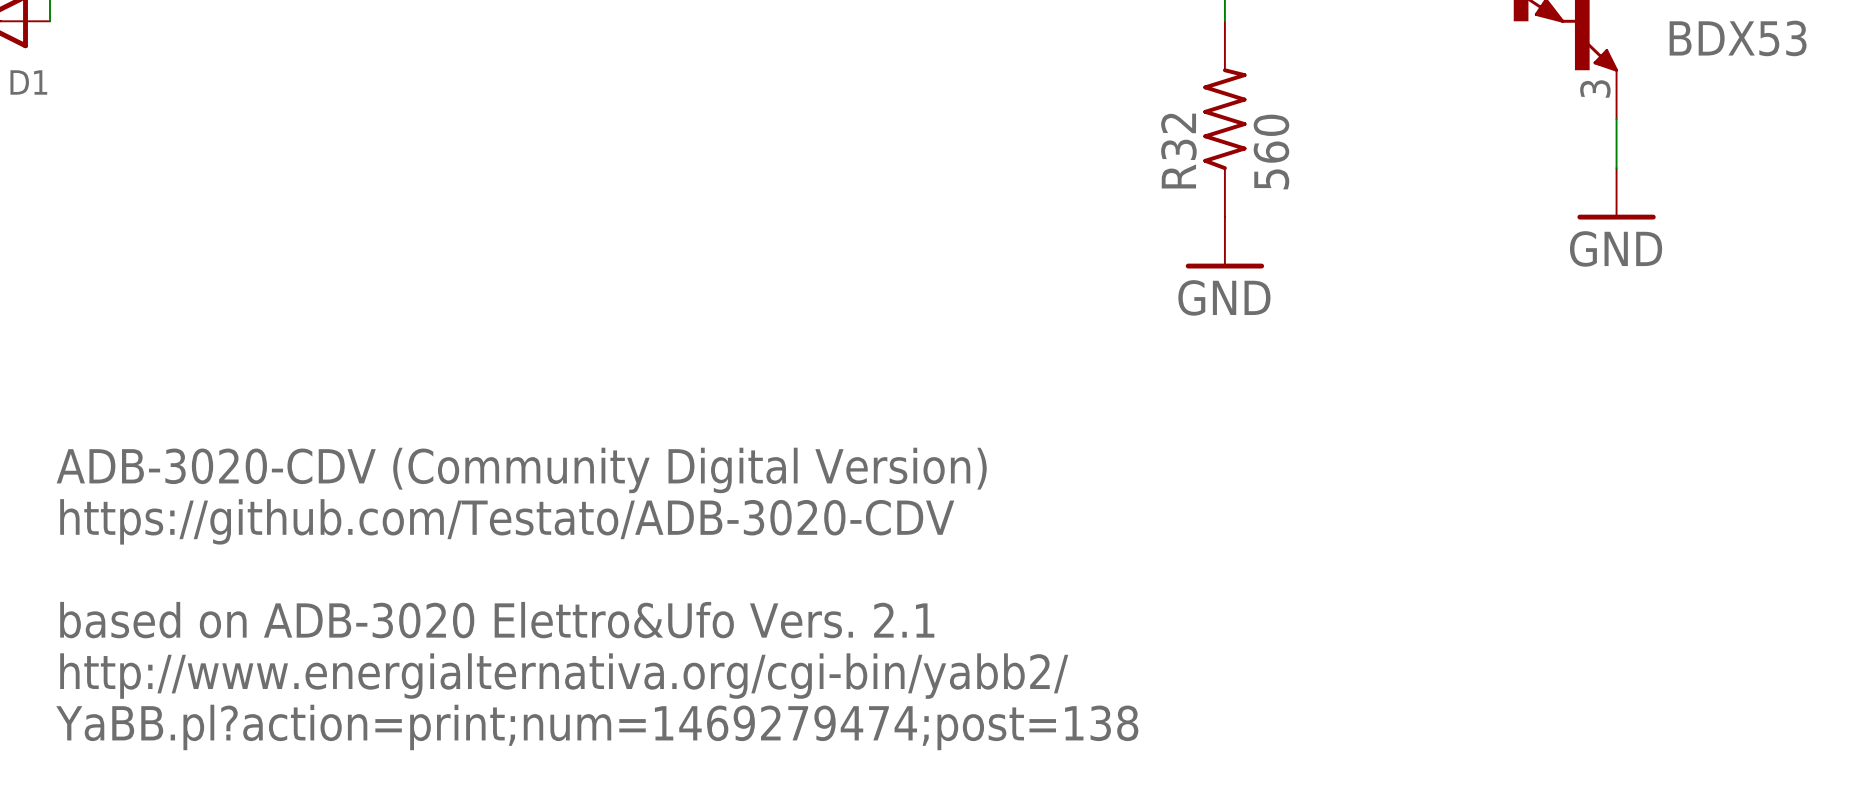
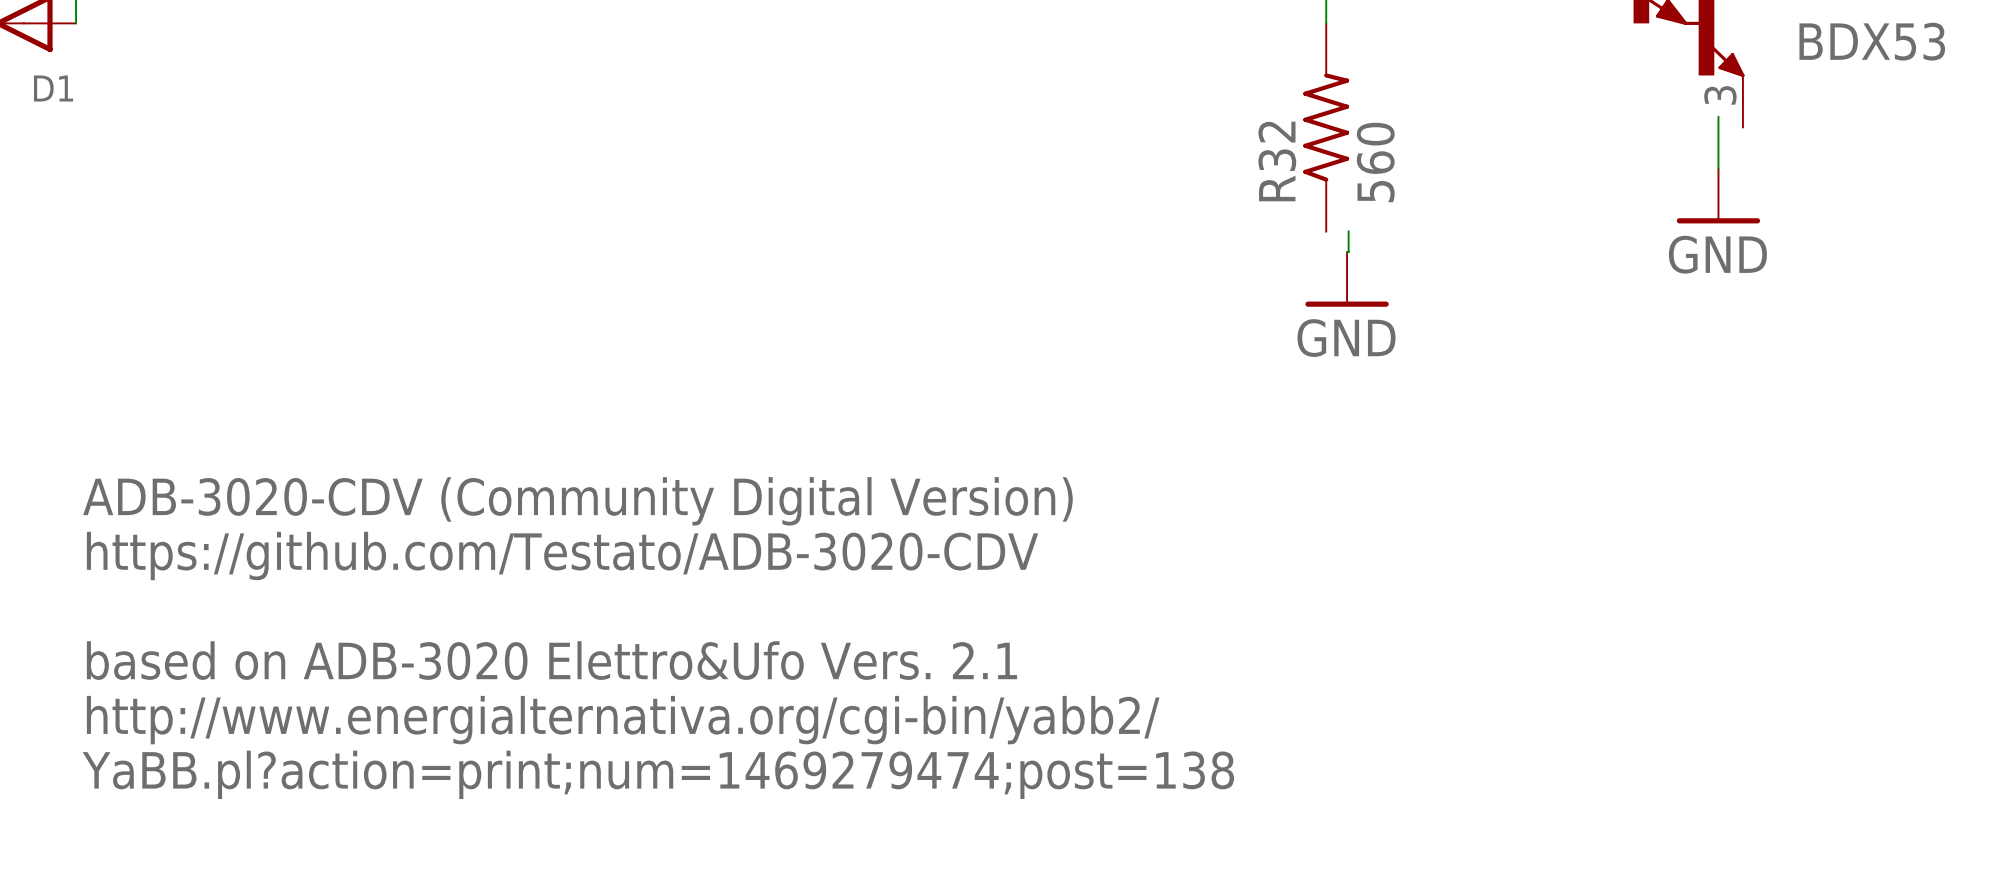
wire: (1616, 119) (1616, 168) -> (1718, 116) (1718, 168)
power symbol position: GND (1616, 193) -> GND (1718, 196)
wire: none -> (1348, 231) (1348, 252) (1347, 252)
power symbol position: GND (1224, 242) -> GND (1347, 279)

